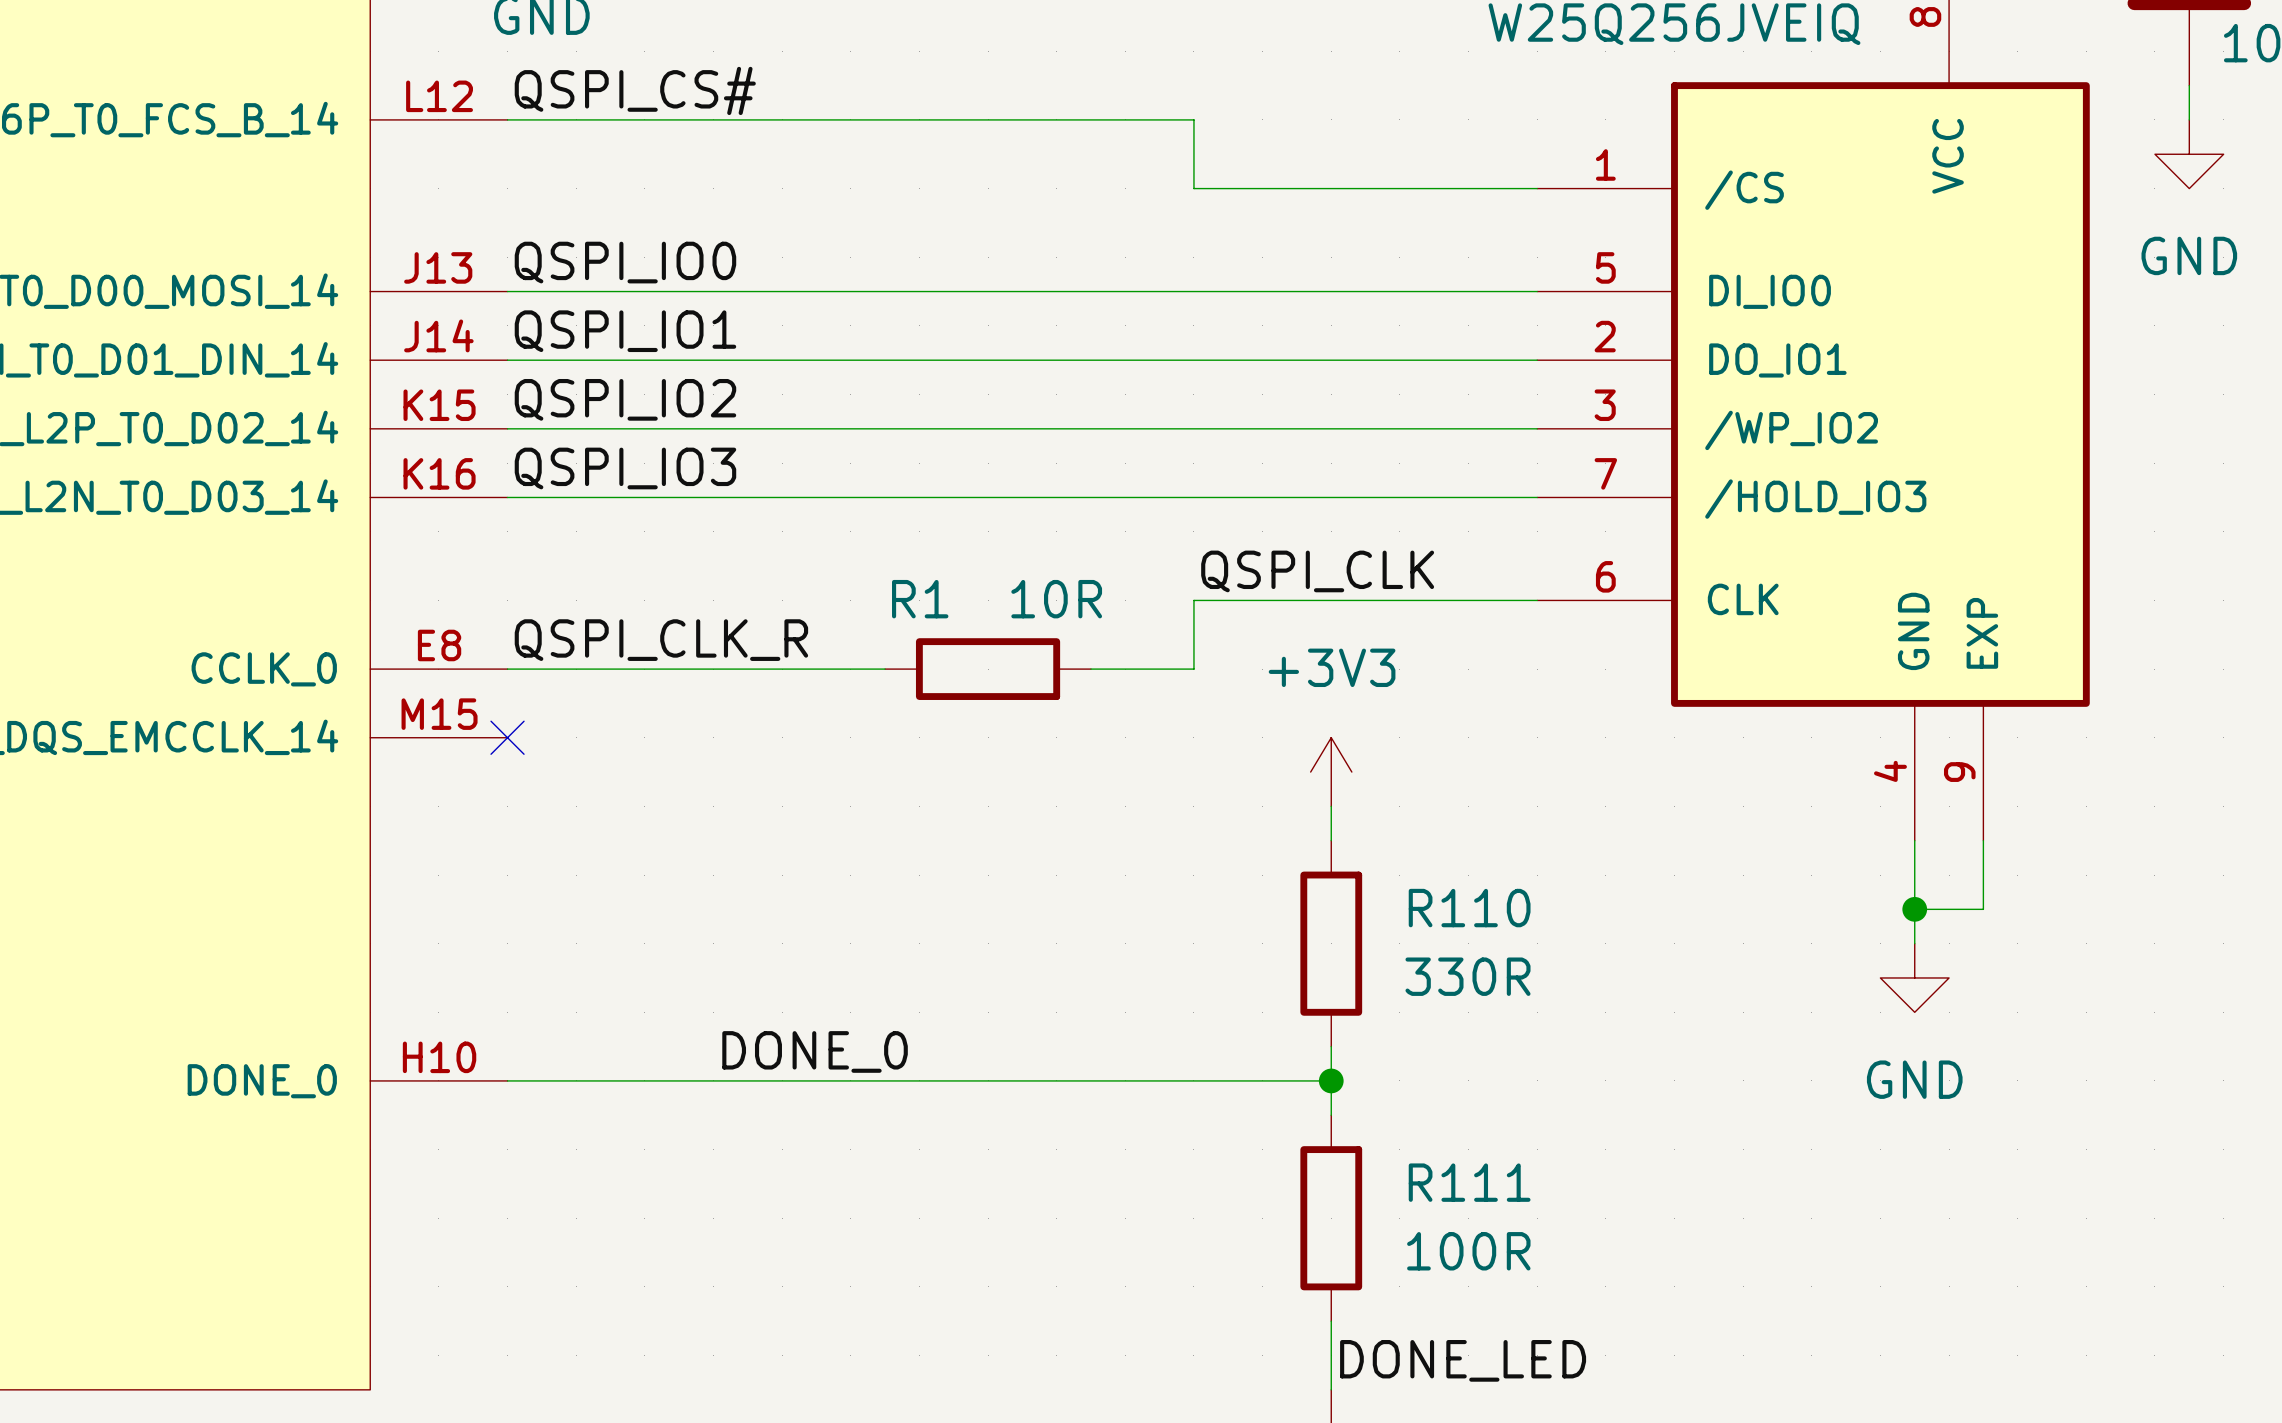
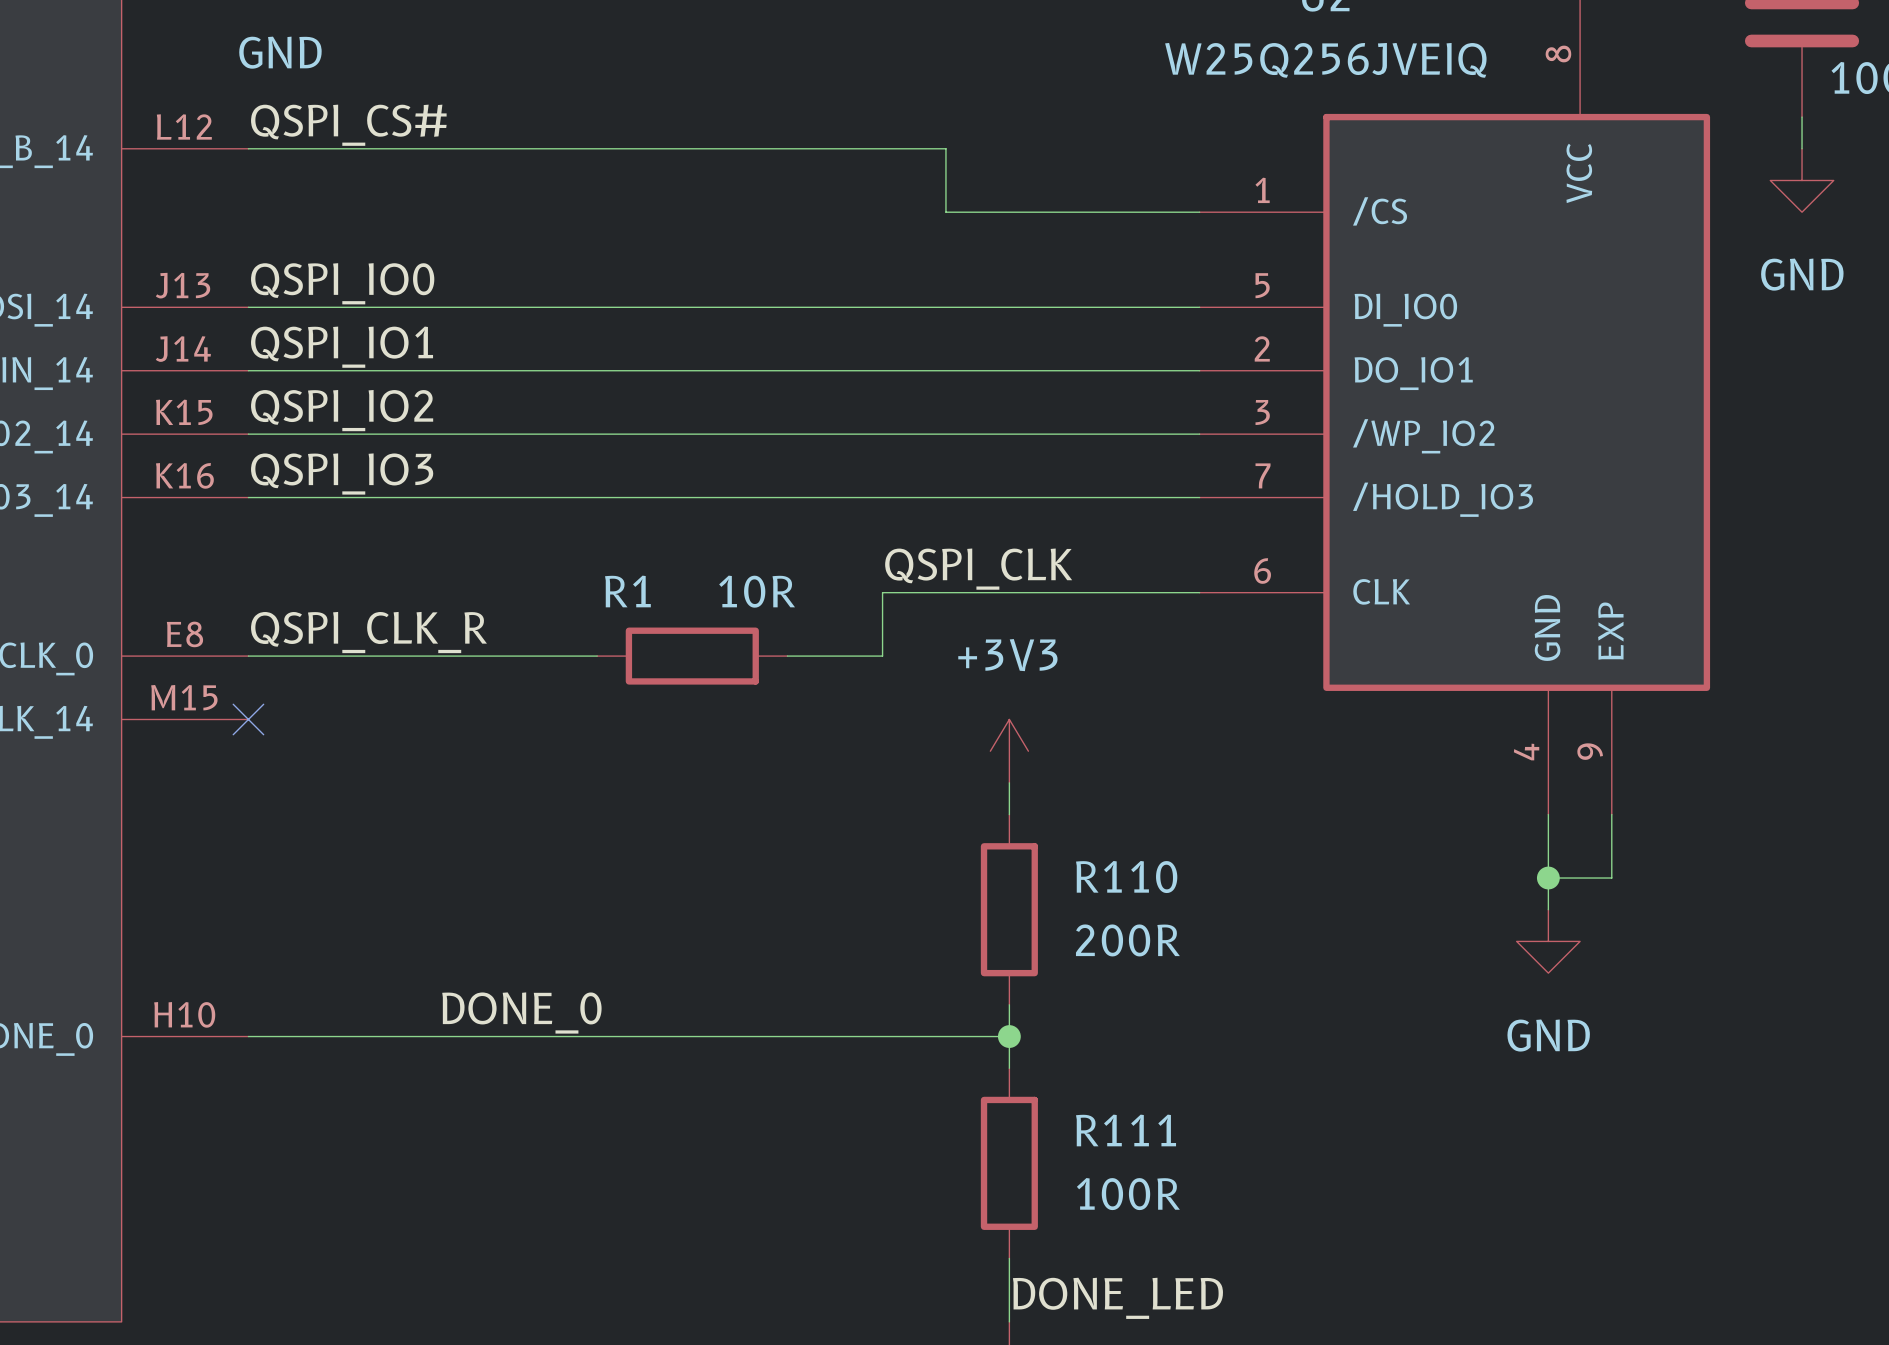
wire: (1193, 119) (1193, 188) (1262, 188) -> (882, 148) (945, 148) (945, 212)
R110 value: 330R (1467, 976) -> 200R (1127, 940)

